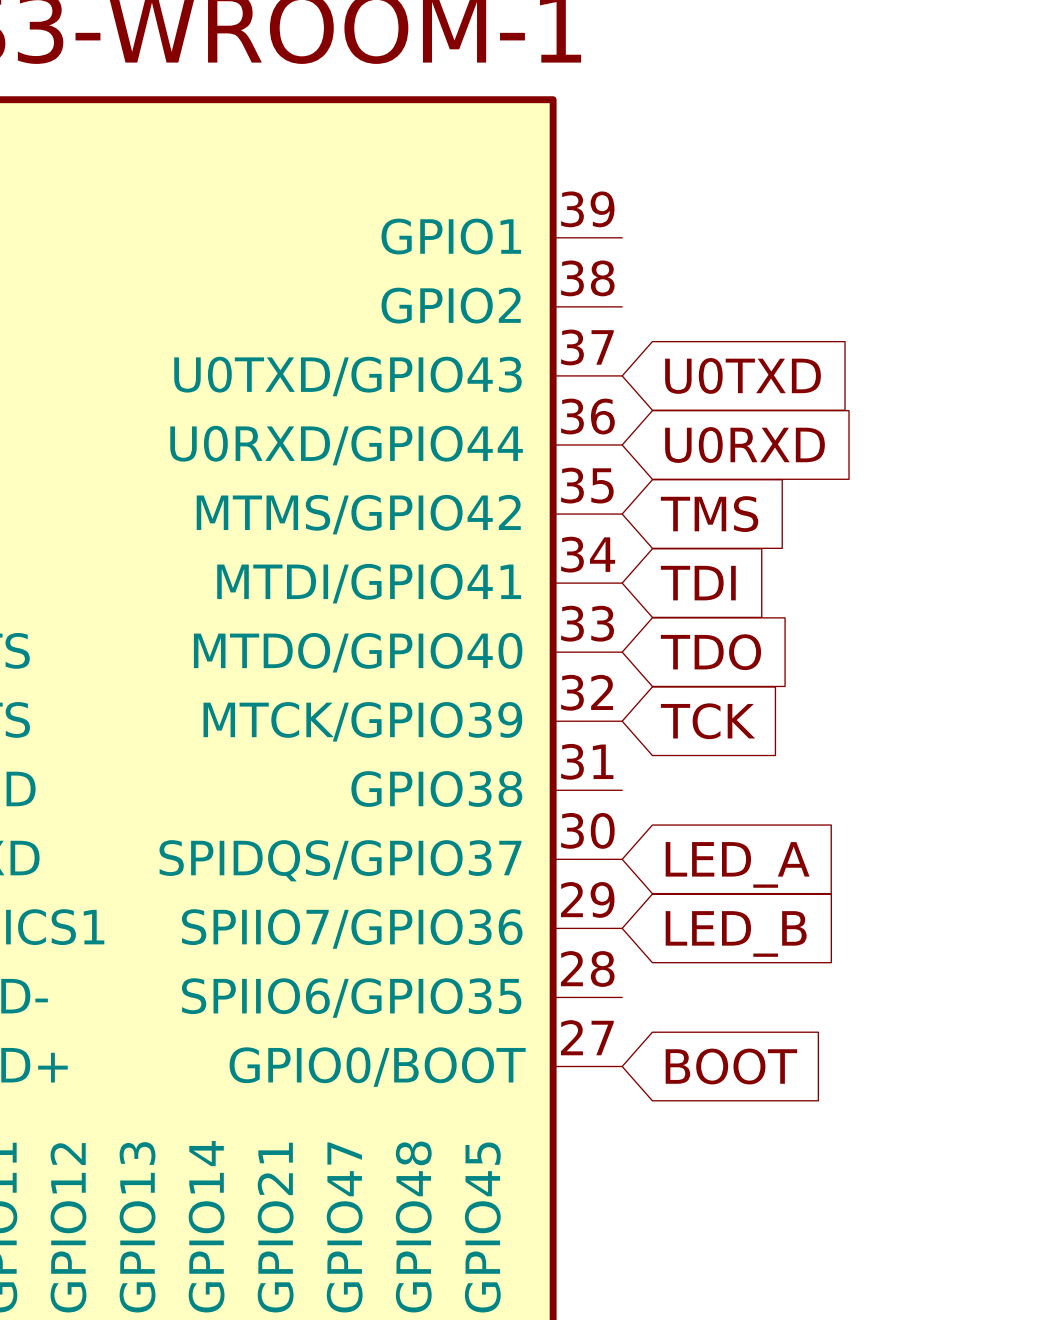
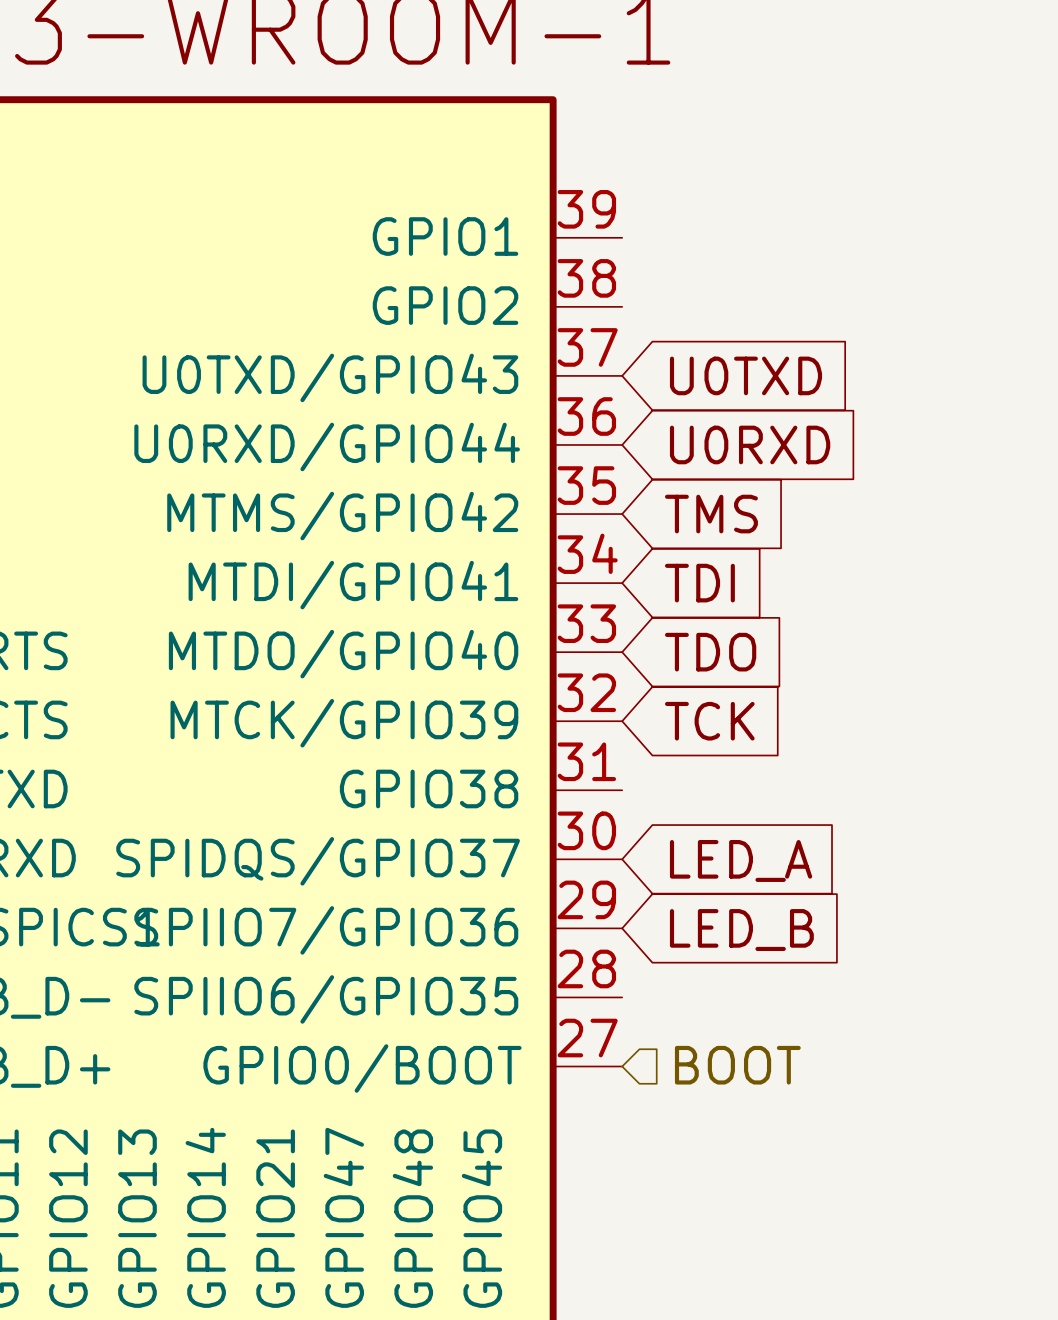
hierarchical label: none -> BOOT (737, 1065)
global label: BOOT (731, 1066) -> none

